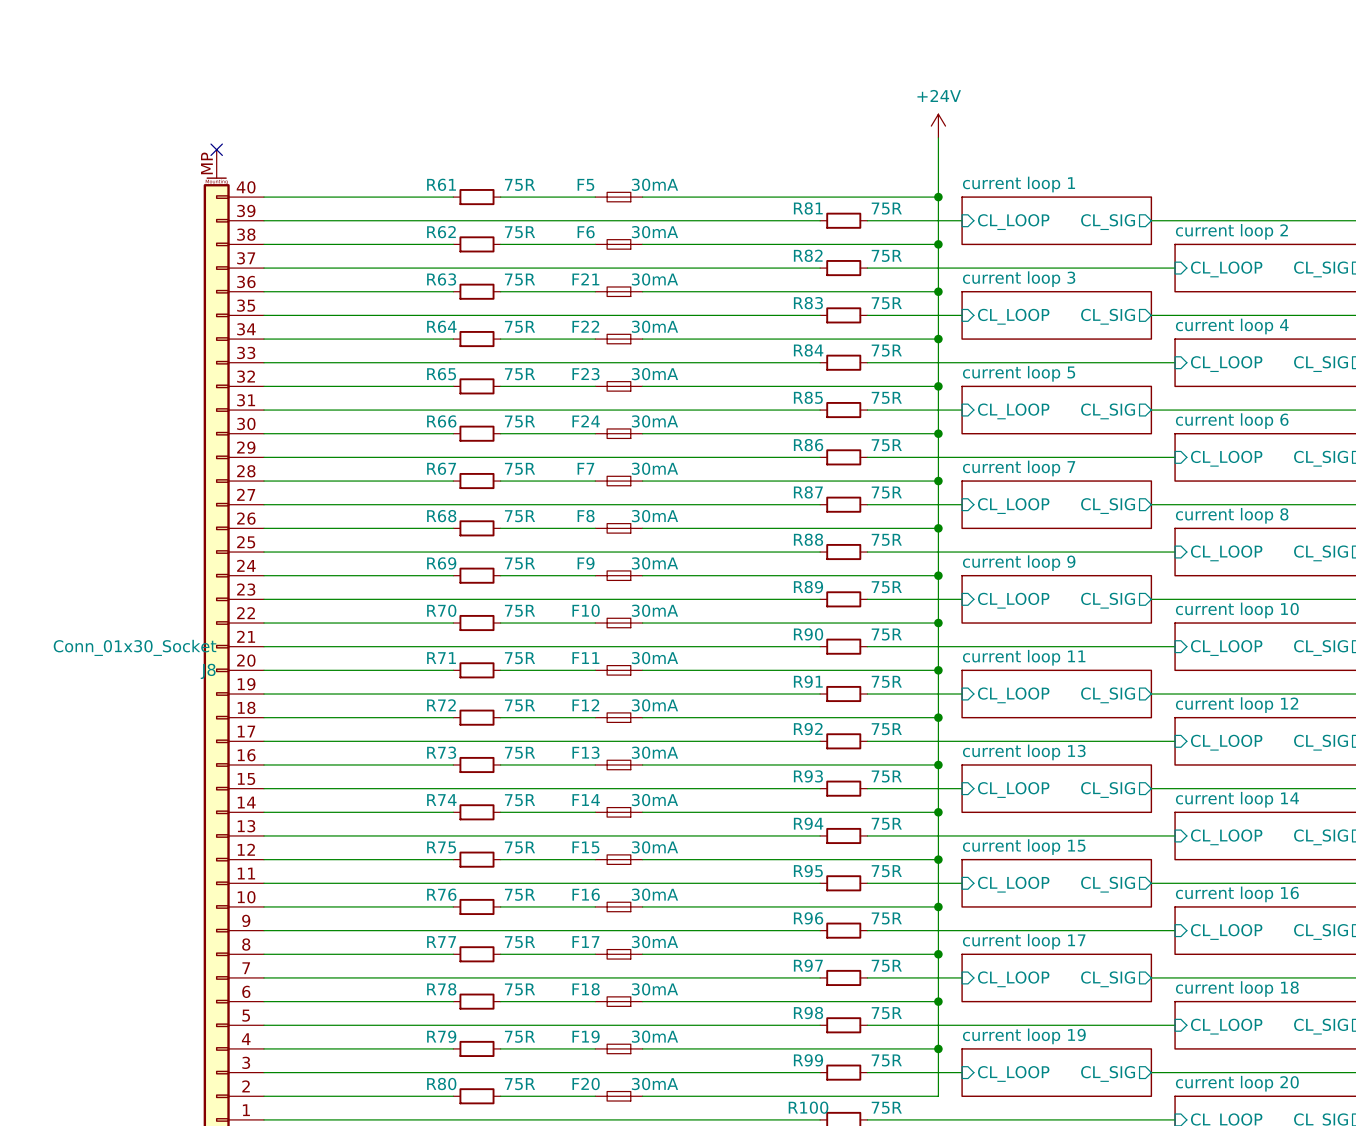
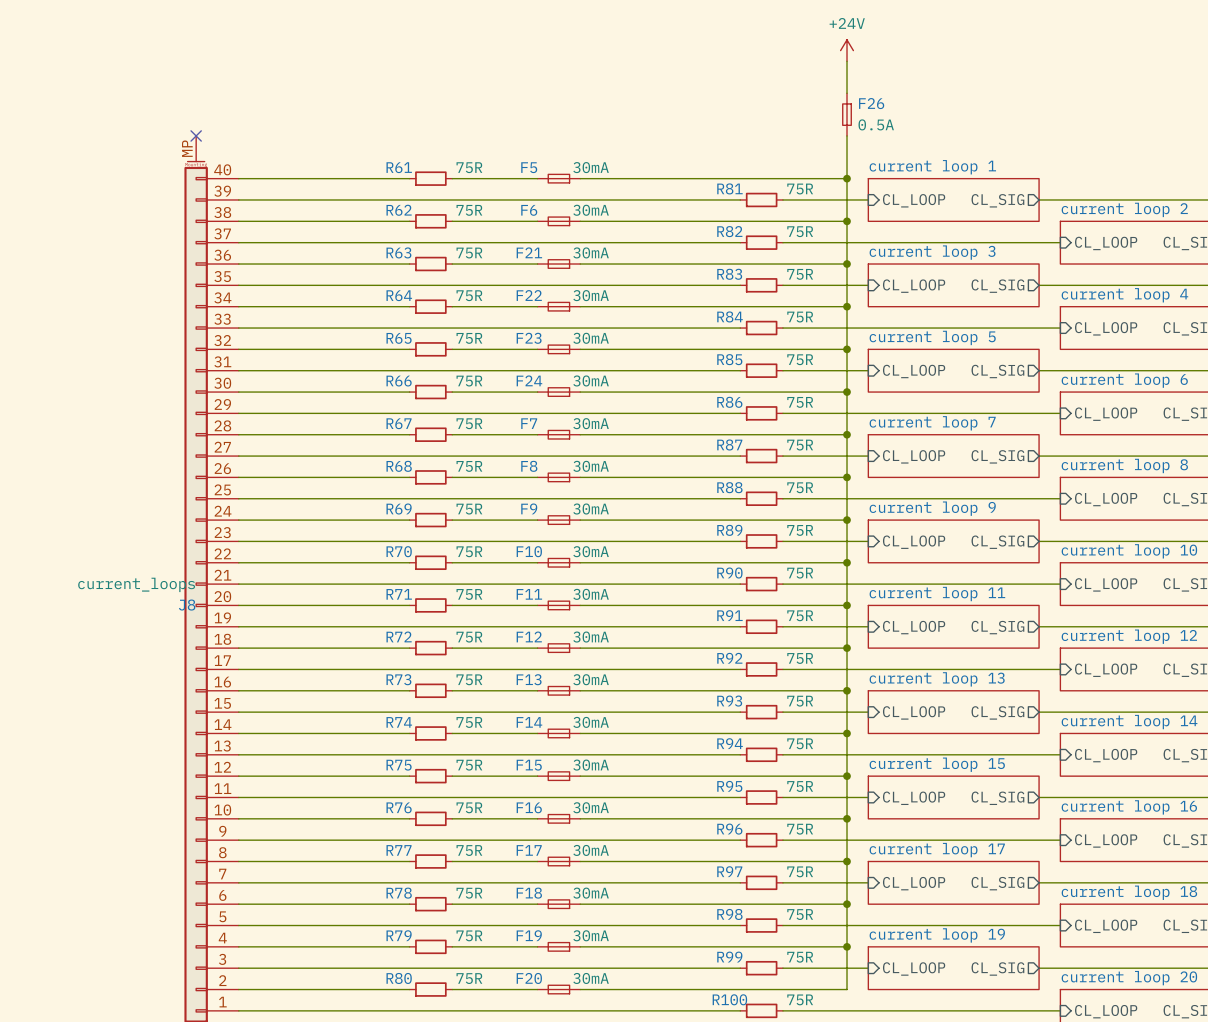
wire: none -> (847, 61) (847, 93)
power symbol position: +24V (938, 126) -> +24V (847, 50)
F26: none -> 0.5A (847, 114)
J8 value: Conn_01x30_Socket (135, 647) -> current_loops (136, 584)

